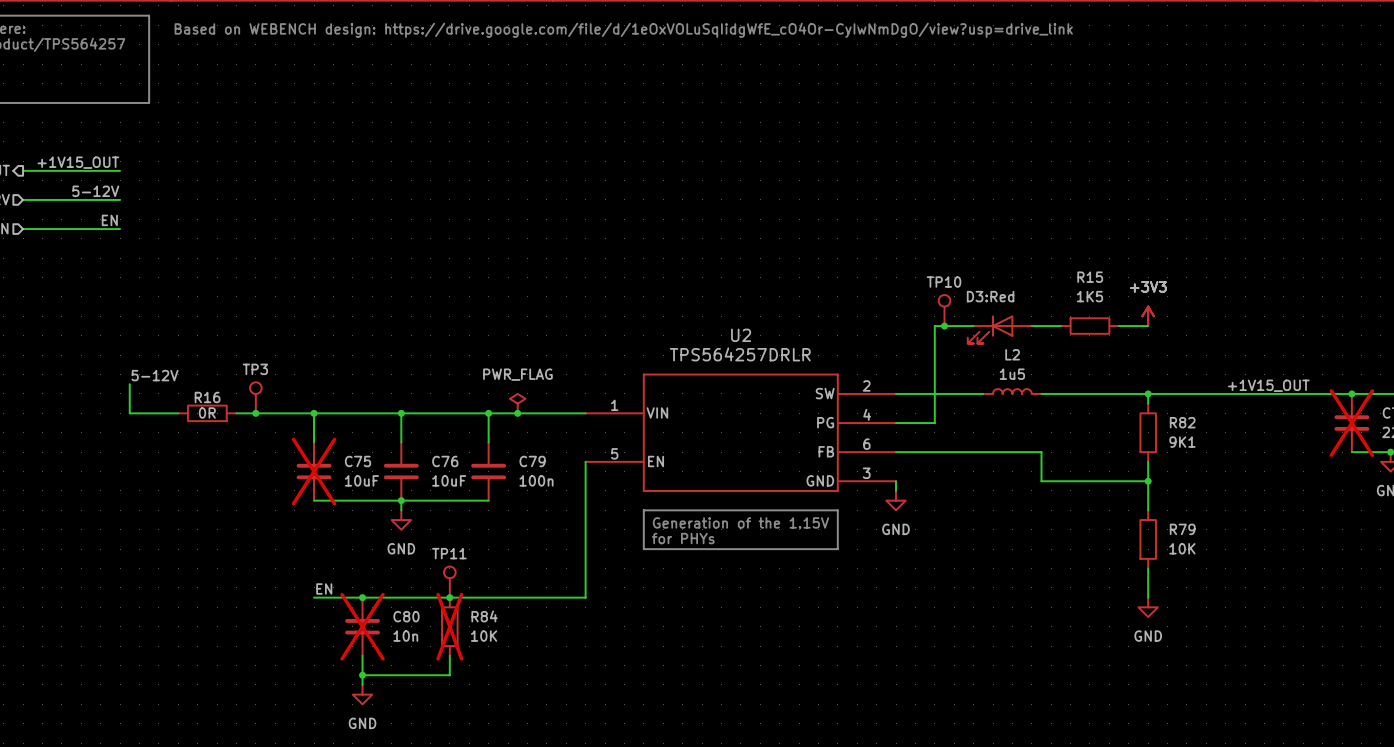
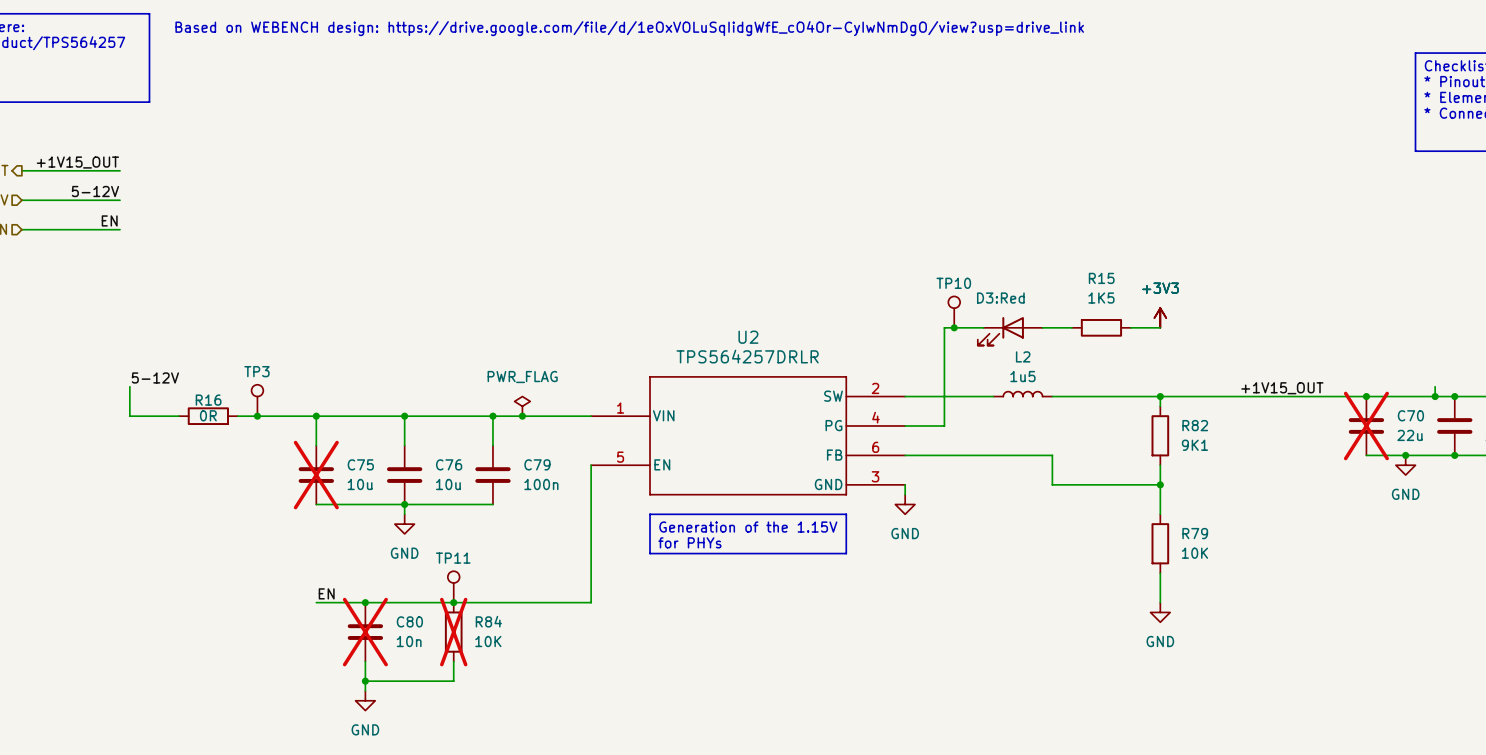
C75 value: 10uF (361, 480) -> 10u (360, 484)
C76 value: 10uF (449, 480) -> 10u (448, 484)

